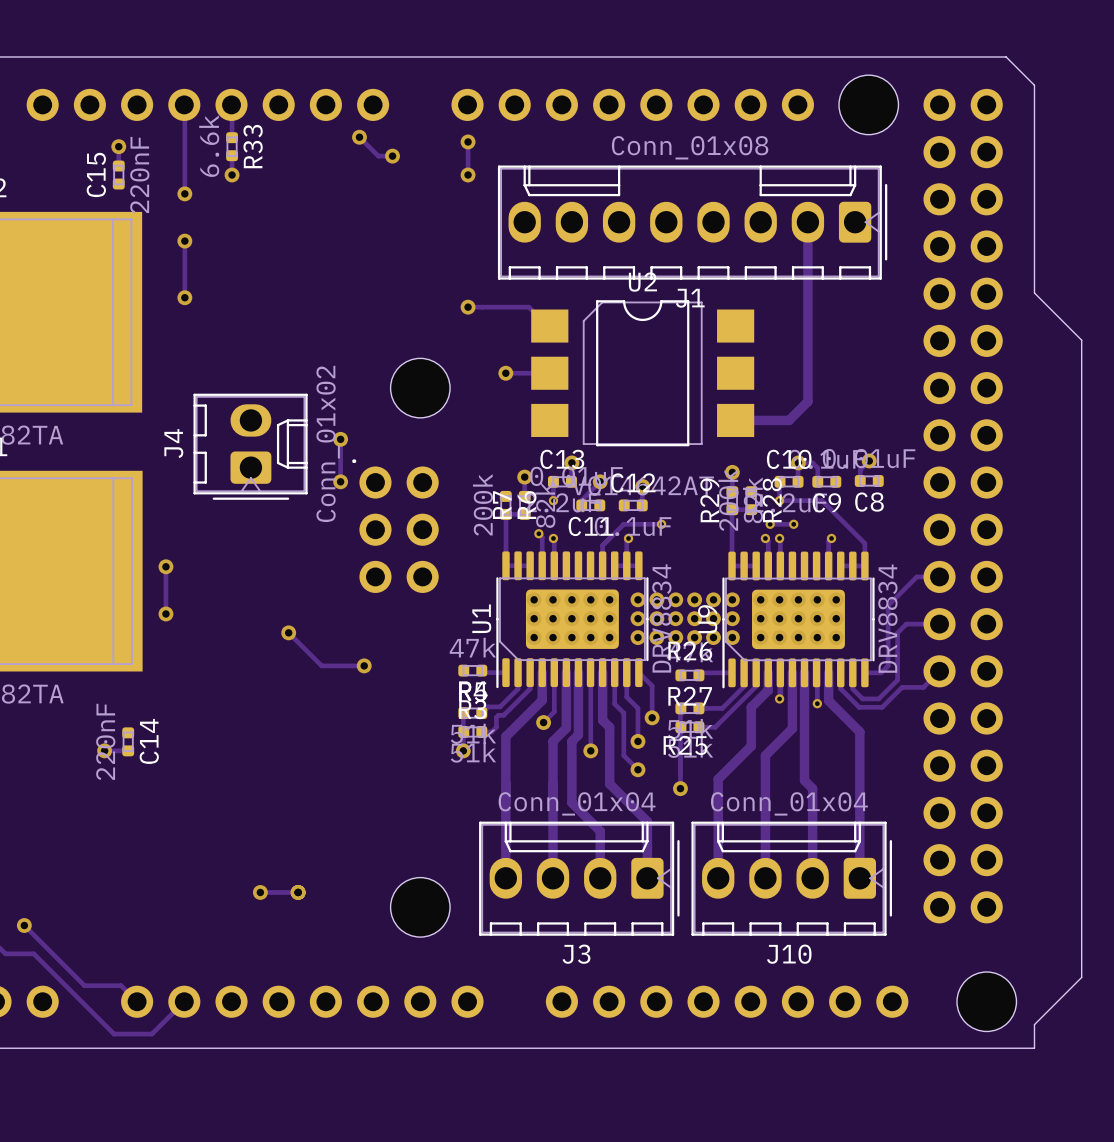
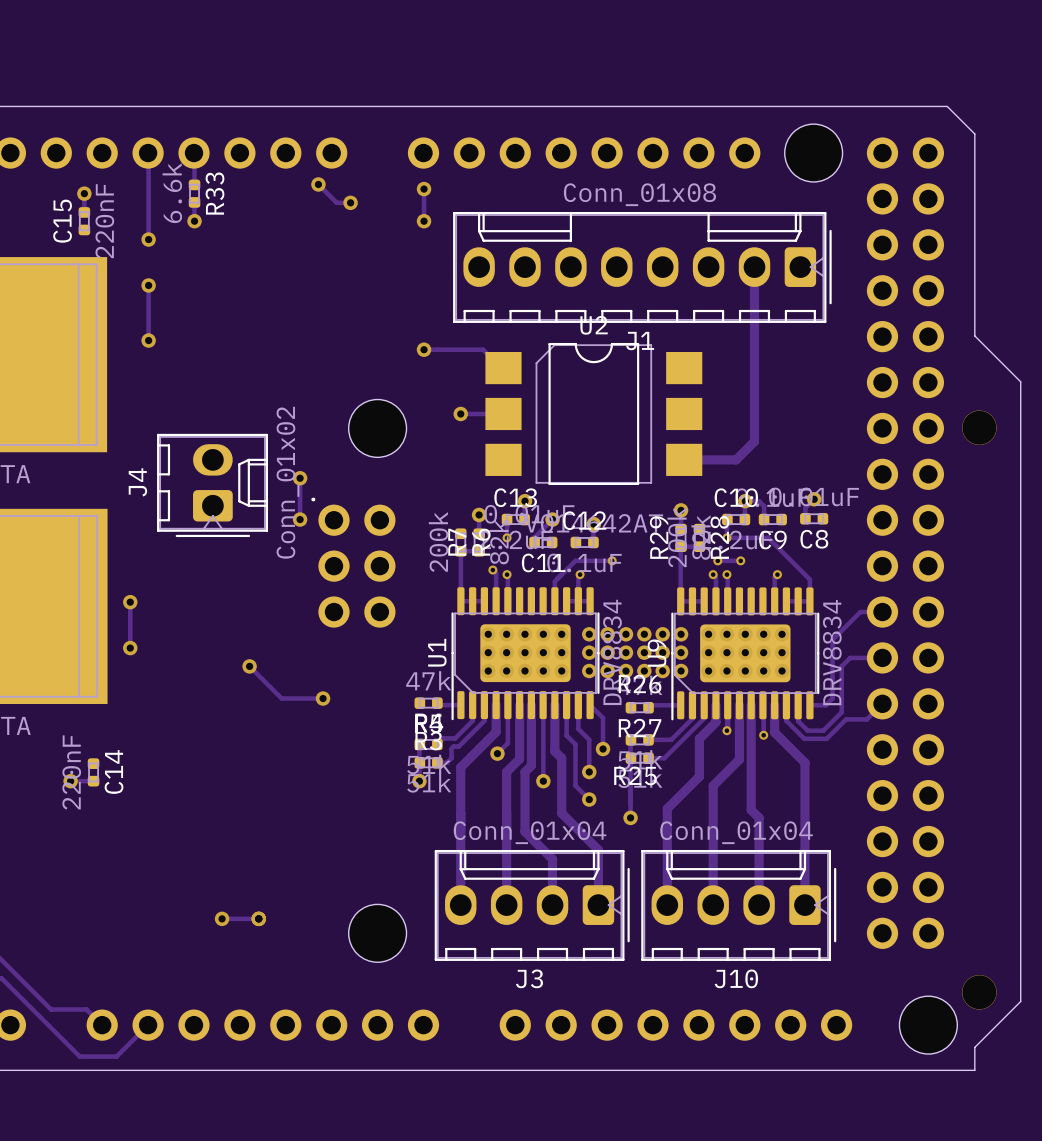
via: none -> (979, 427)
via: none -> (979, 992)

